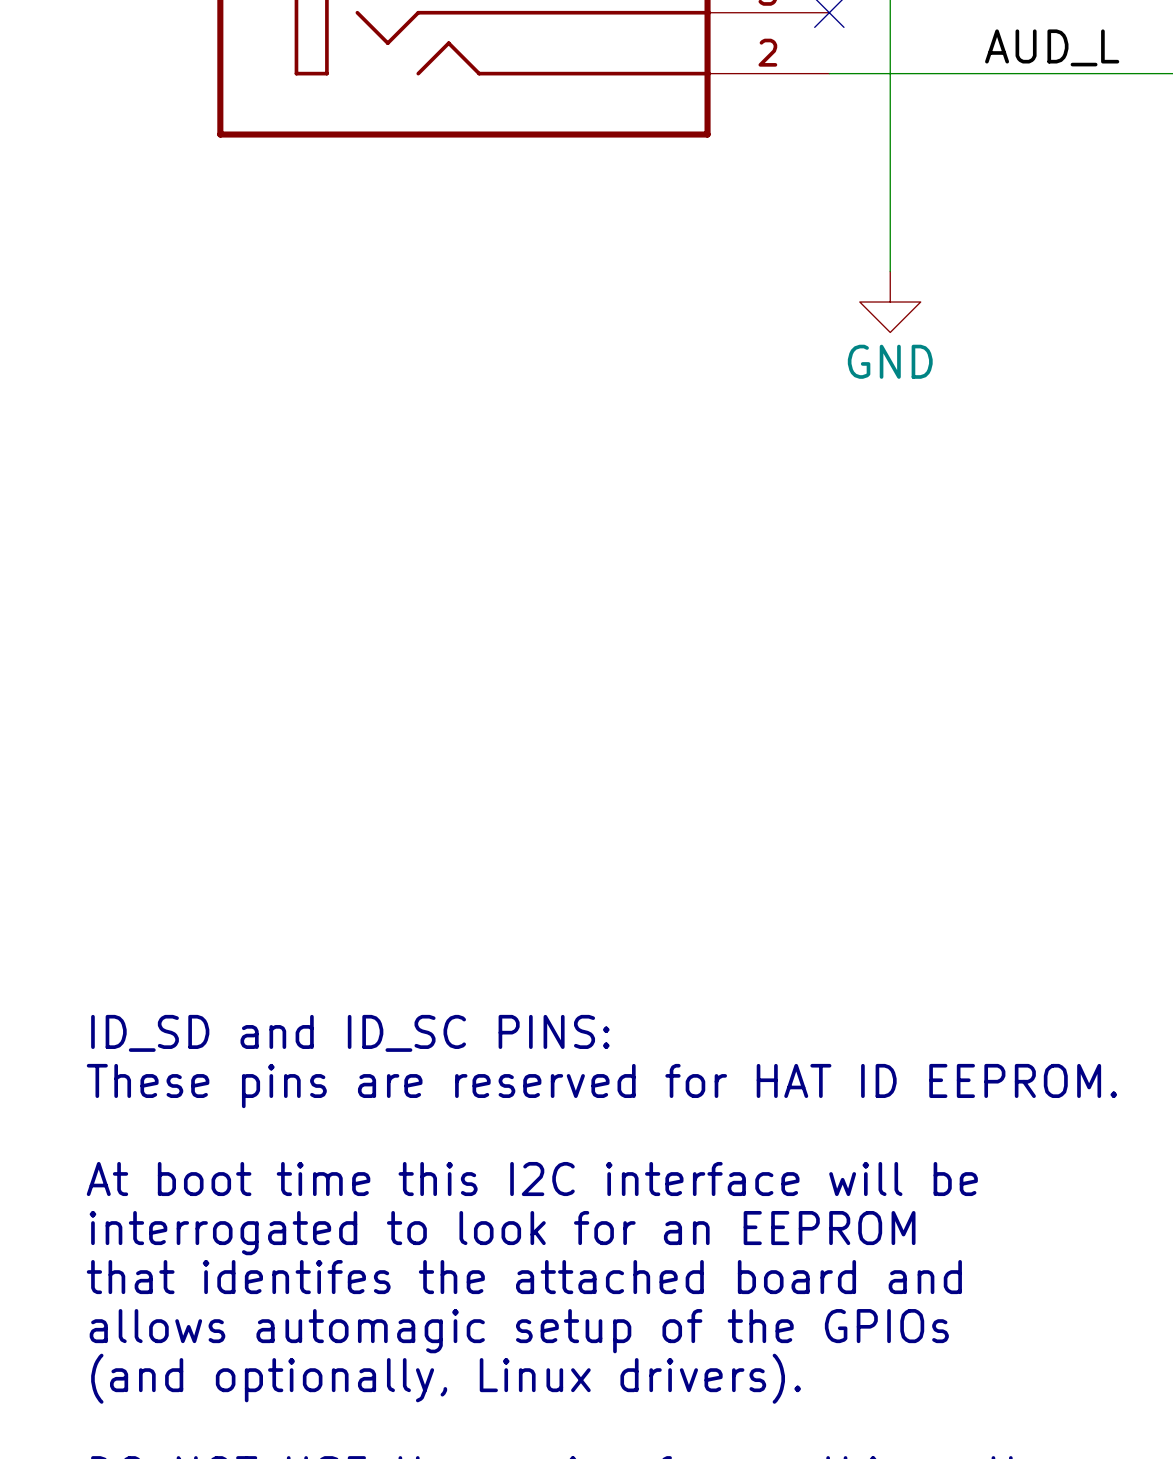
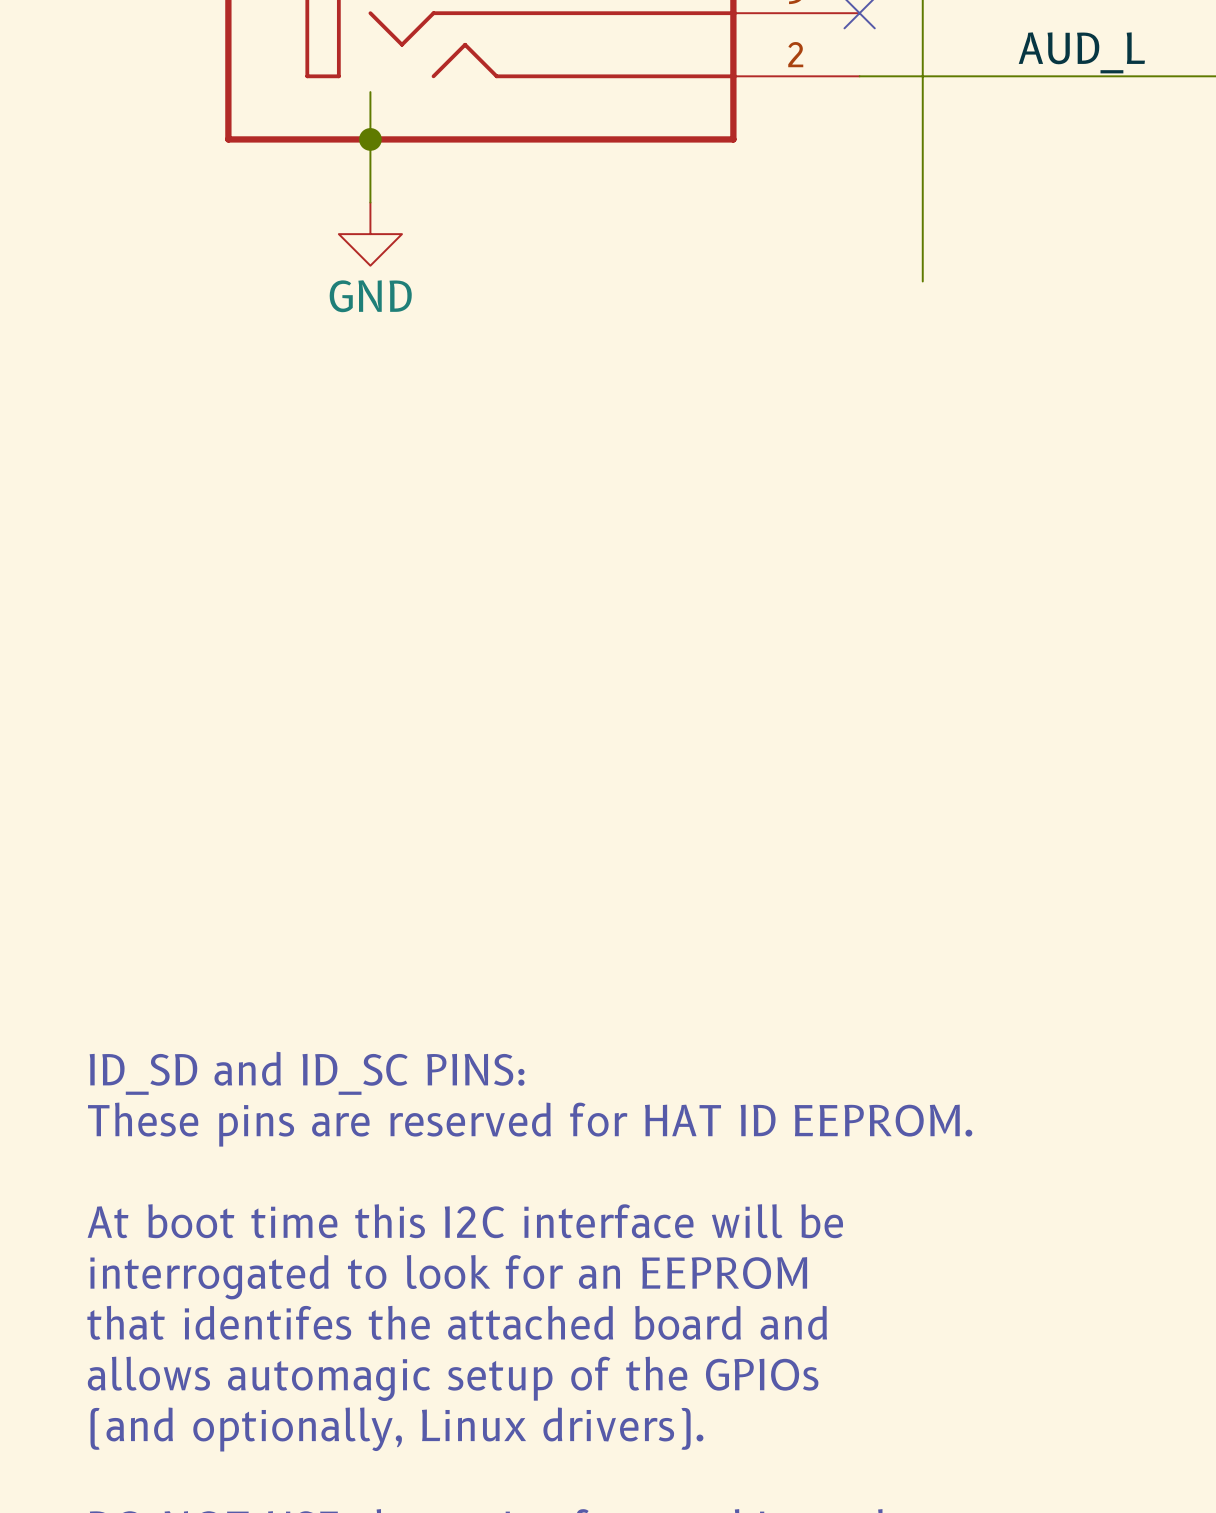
wire: none -> (370, 92) (370, 202)
junction: none -> (370, 139)
power symbol: none -> GND (370, 234)
power symbol: GND (890, 302) -> none

